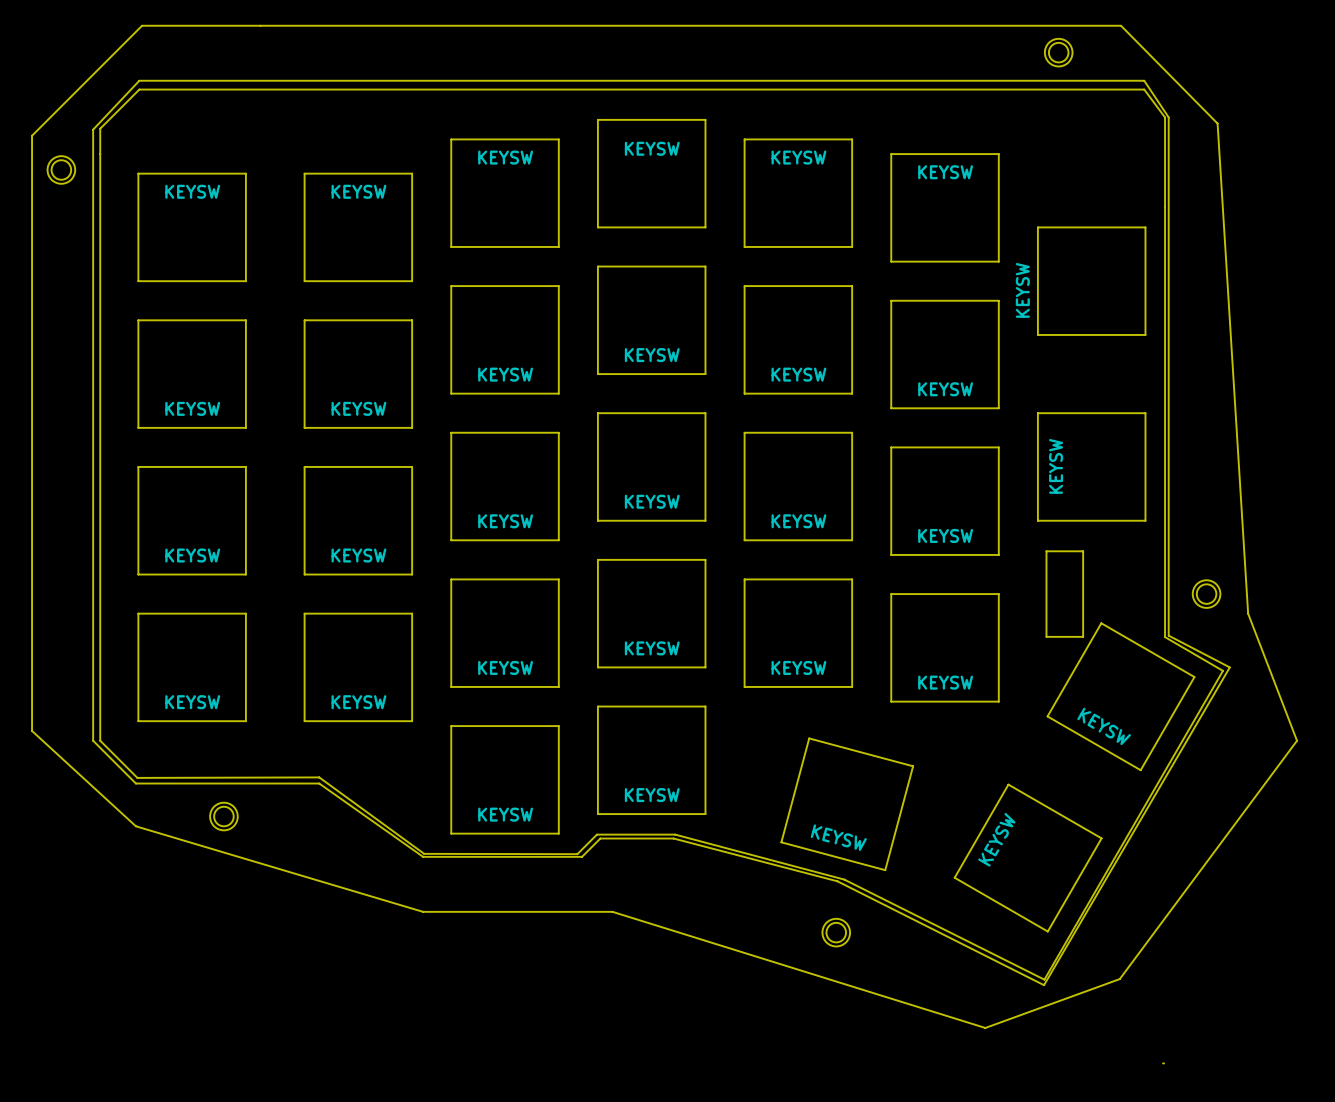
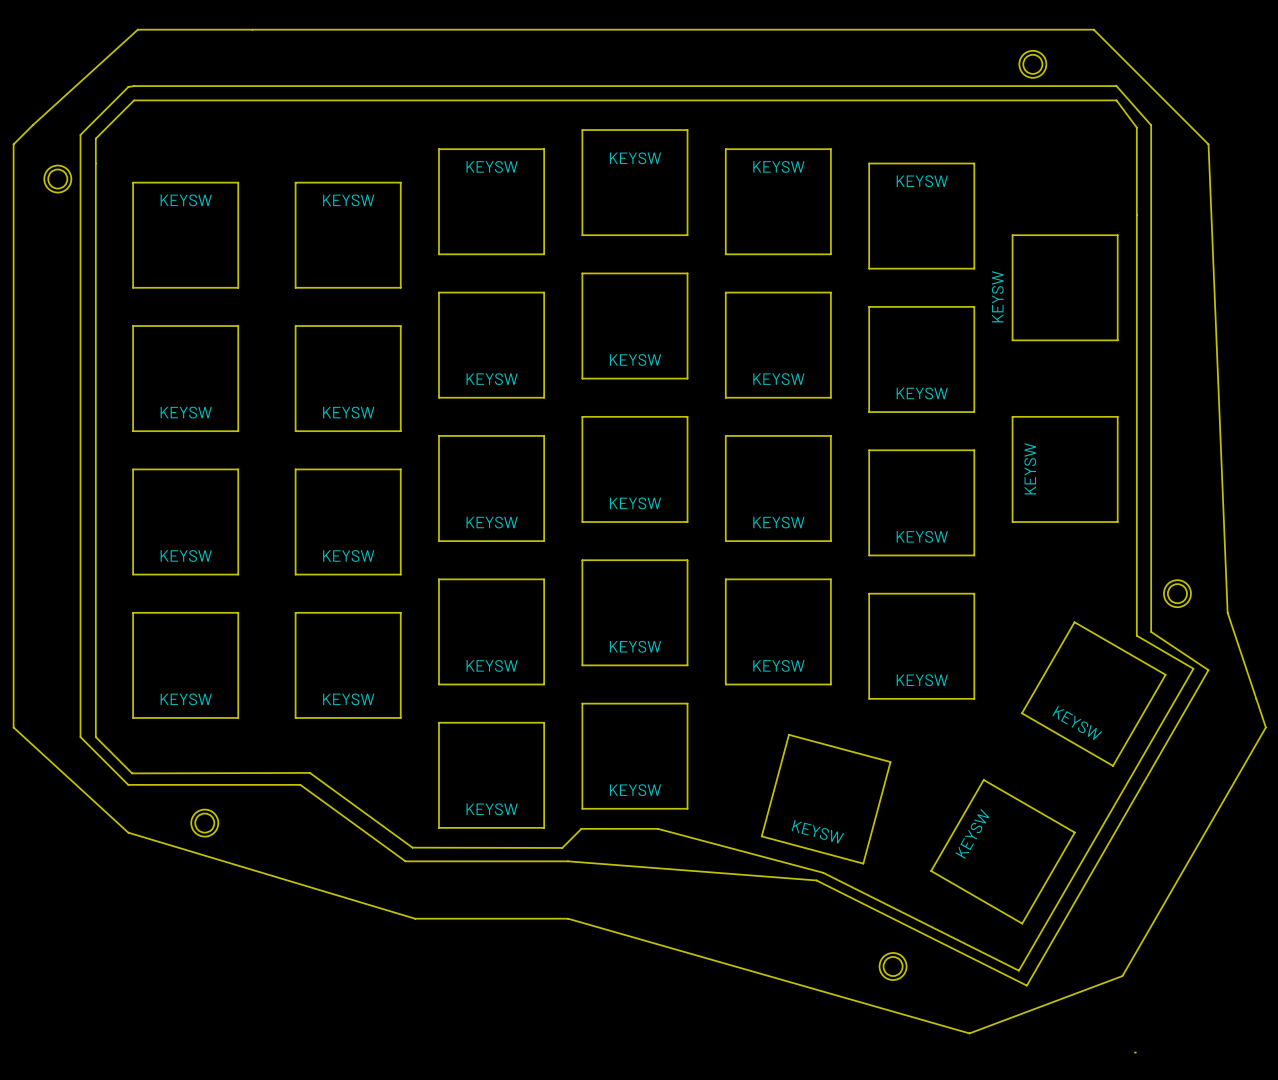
board edge: (142, 25) (32, 135) (32, 730) (135, 826) (423, 911) (612, 911) (985, 1027) (1119, 979) (1297, 740) (1248, 613) (1217, 123) (1121, 25) (142, 25) -> (137, 29) (13, 144) (13, 727) (128, 832) (415, 918) (568, 918) (969, 1033) (1122, 976) (1265, 727) (1227, 612) (1208, 144) (1093, 29) (137, 29)
board edge: (139, 80) (93, 129) (93, 740) (135, 783) (319, 783) (423, 856) (582, 856) (600, 838) (673, 838) (837, 881) (1044, 985) (1229, 667) (1168, 635) (1168, 117) (1144, 80) (139, 80) -> (134, 86) (128, 87) (80, 134) (80, 737) (128, 784) (300, 784) (405, 861) (568, 861) (816, 880) (1026, 985) (1208, 670) (1151, 631) (1151, 125) (1116, 86) (134, 86)
board edge: (1046, 551) (1083, 551) (1083, 636) (1046, 636) (1046, 551) -> none
round board edge position: (223, 816) -> (204, 823)
round board edge position: (223, 816) -> (204, 823)
round board edge position: (836, 932) -> (893, 966)
round board edge position: (836, 932) -> (893, 966)

